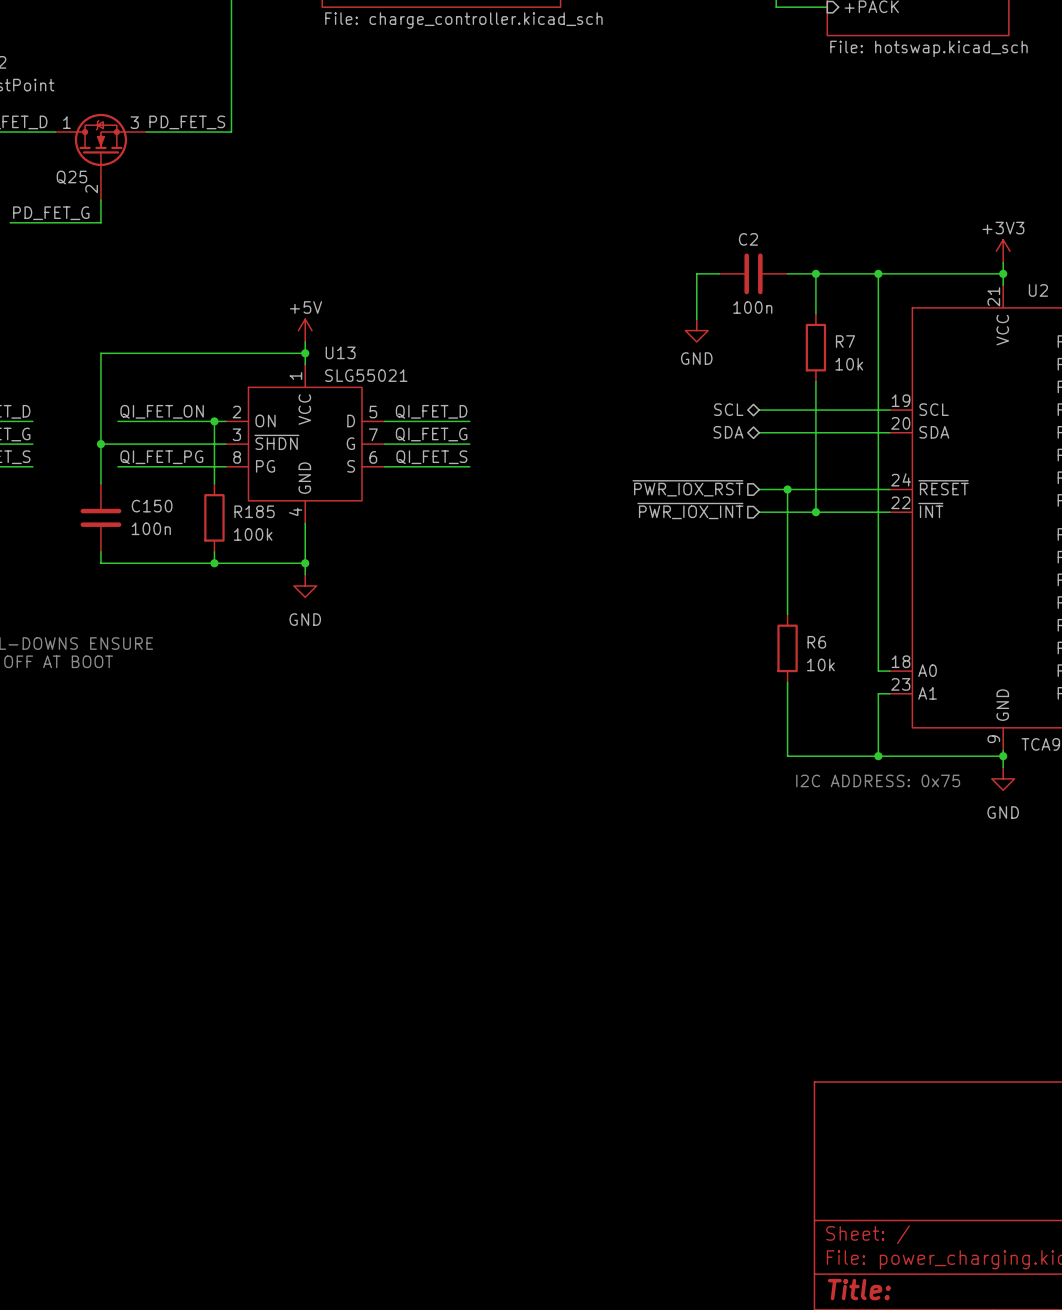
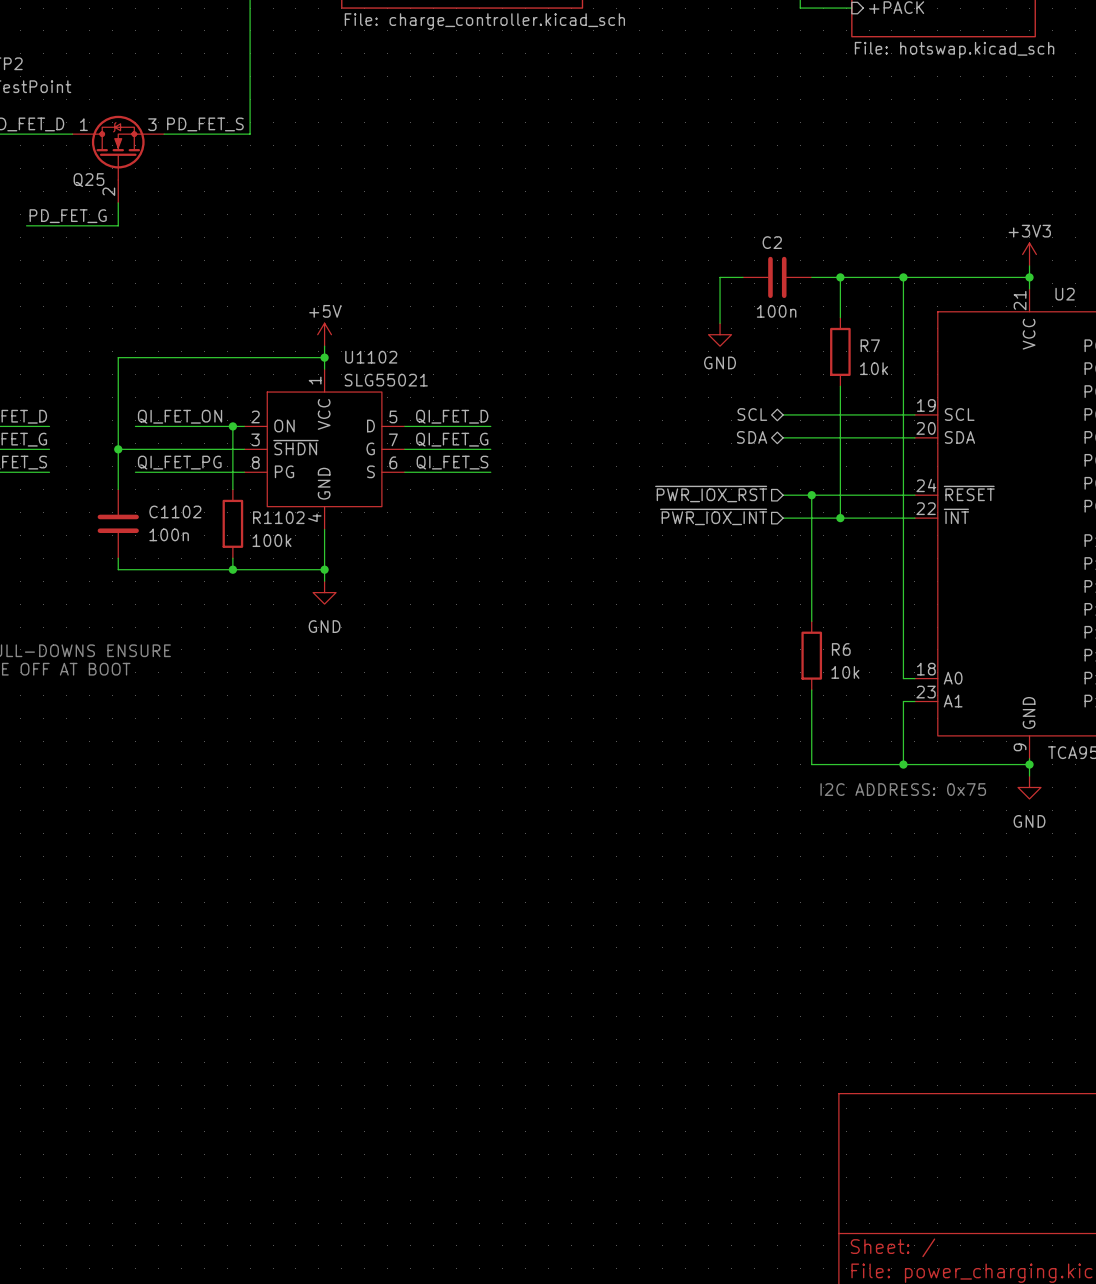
U13 name: U13 (340, 352) -> U1102 (371, 357)
C150 name: C150 (152, 506) -> C1102 (175, 511)
R185 name: R185 (254, 511) -> R1102 (278, 517)

